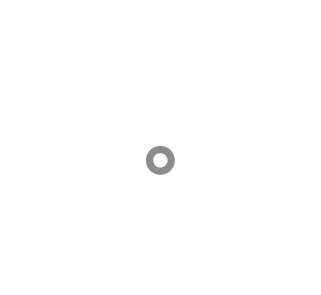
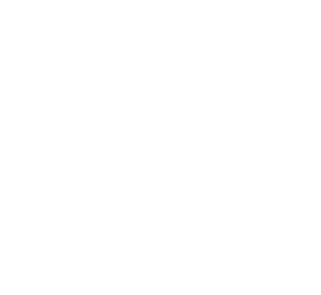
via: (160, 160) -> none

